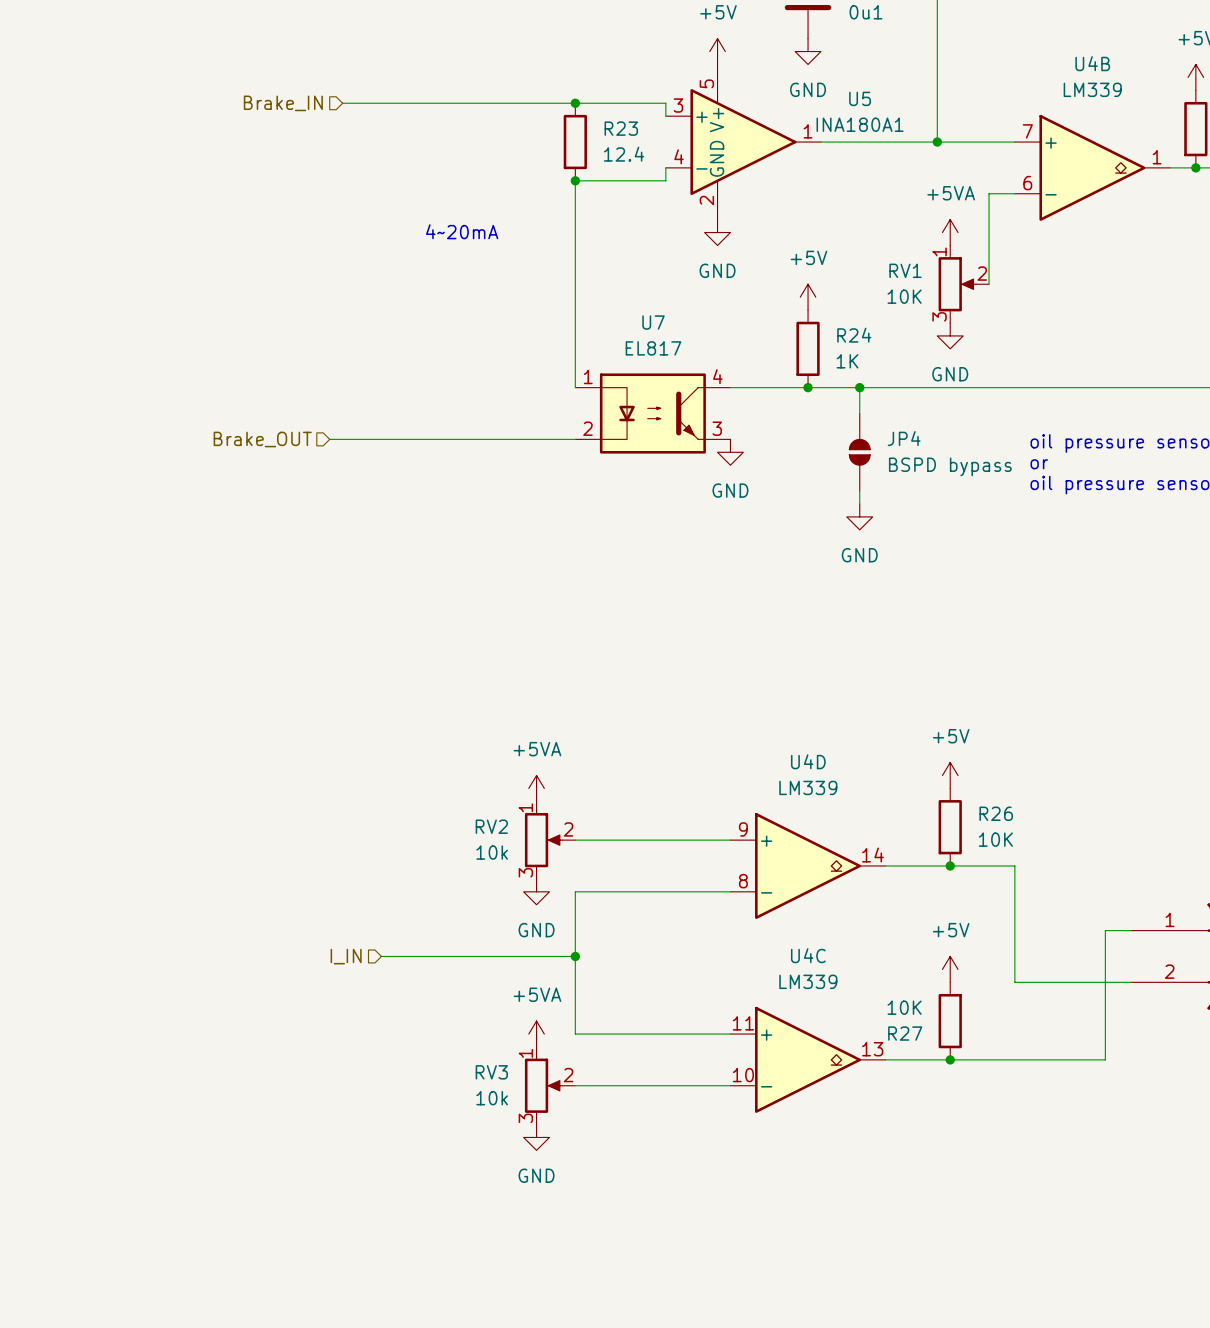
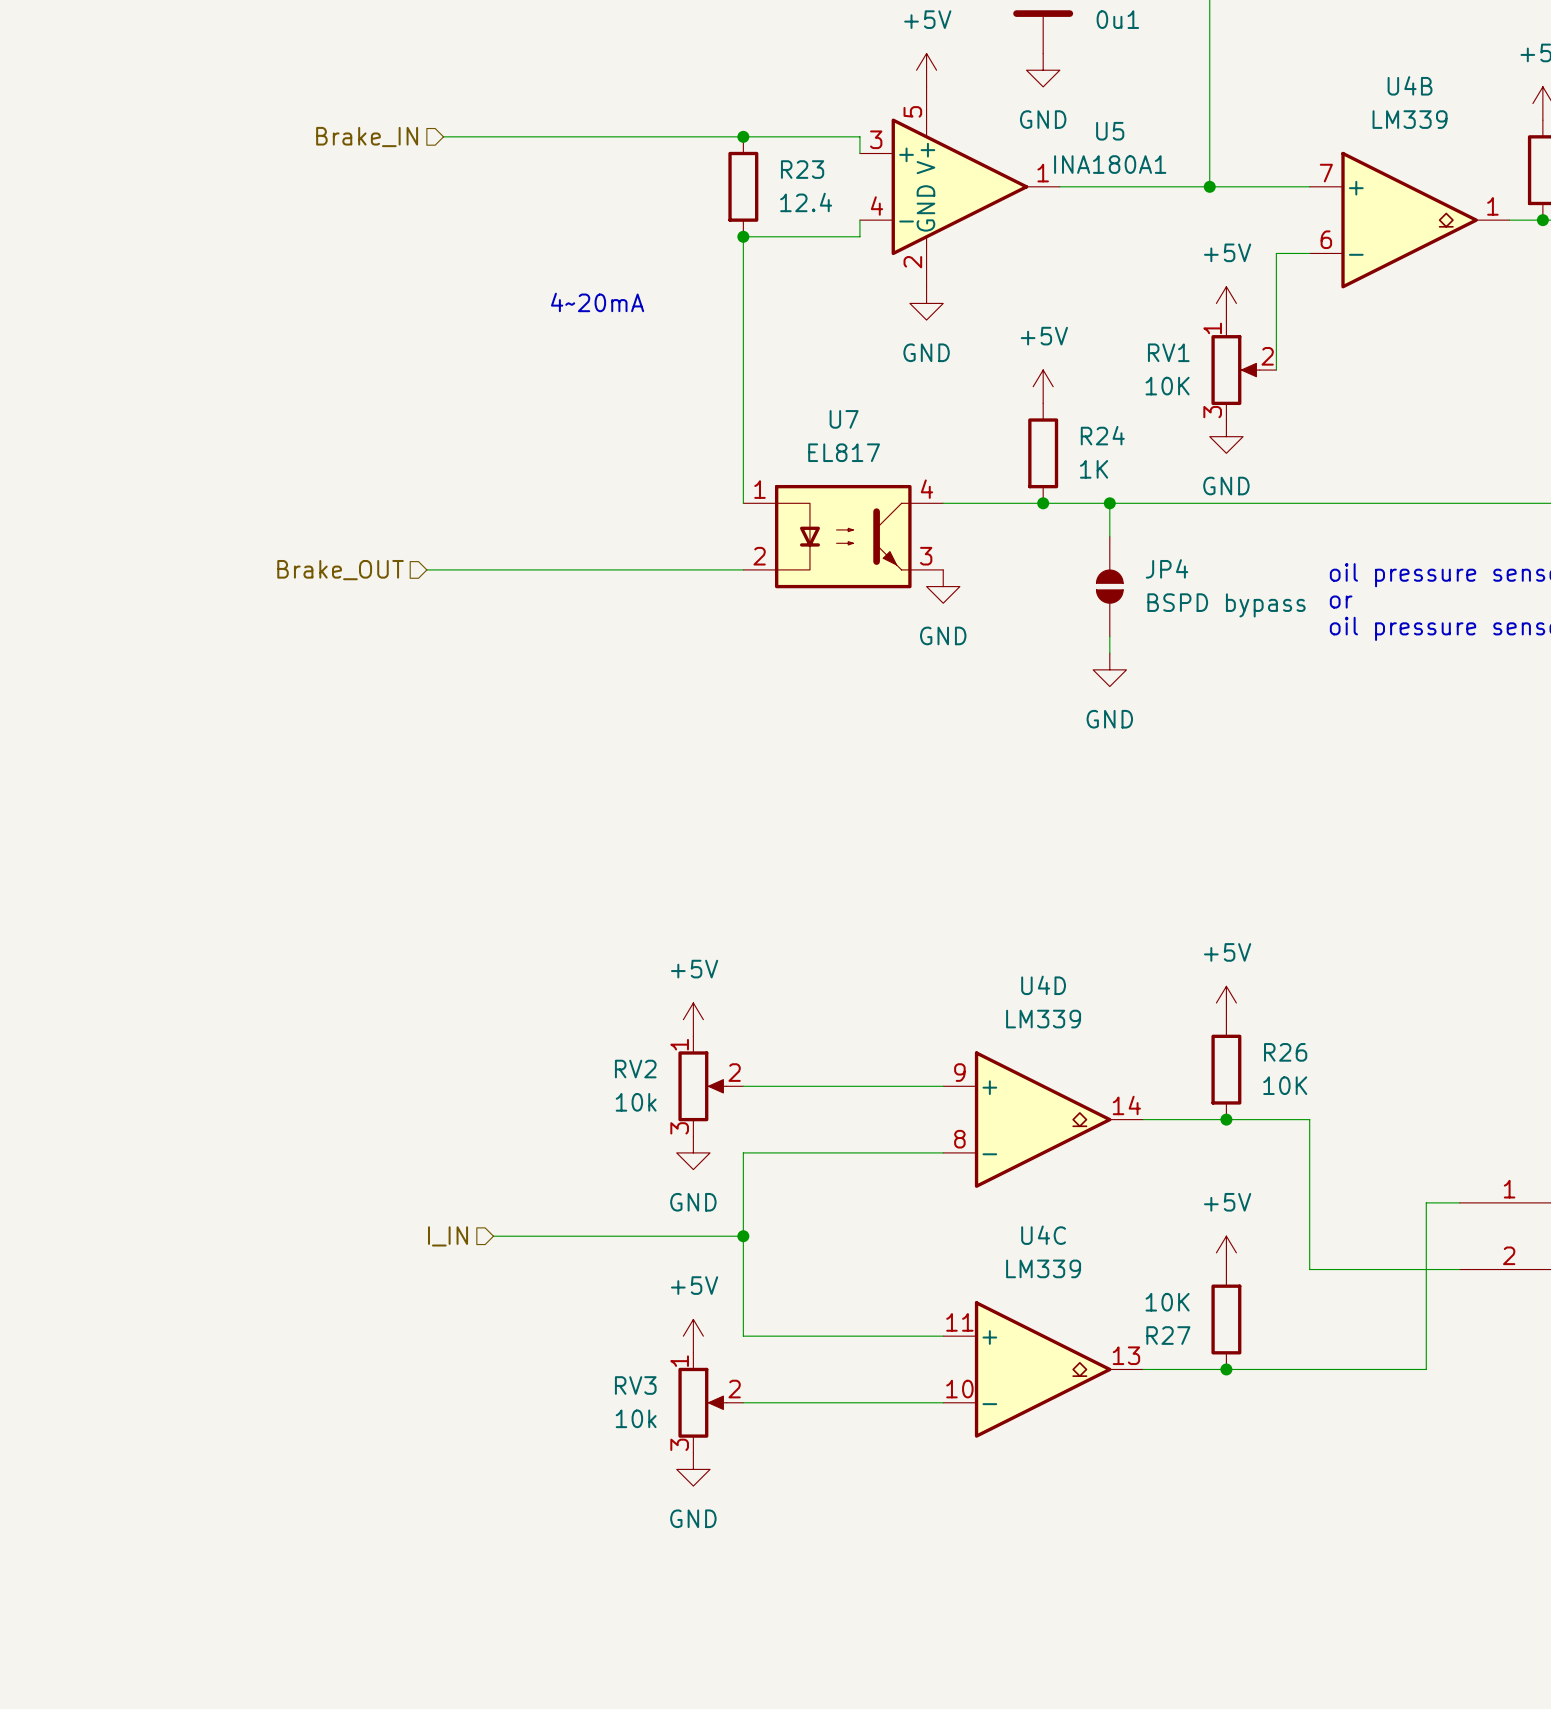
power symbol: +5VA (950, 232) -> +5V (1226, 303)
power symbol: +5VA (536, 788) -> +5V (693, 1019)
power symbol: +5VA (536, 1034) -> +5V (693, 1336)

